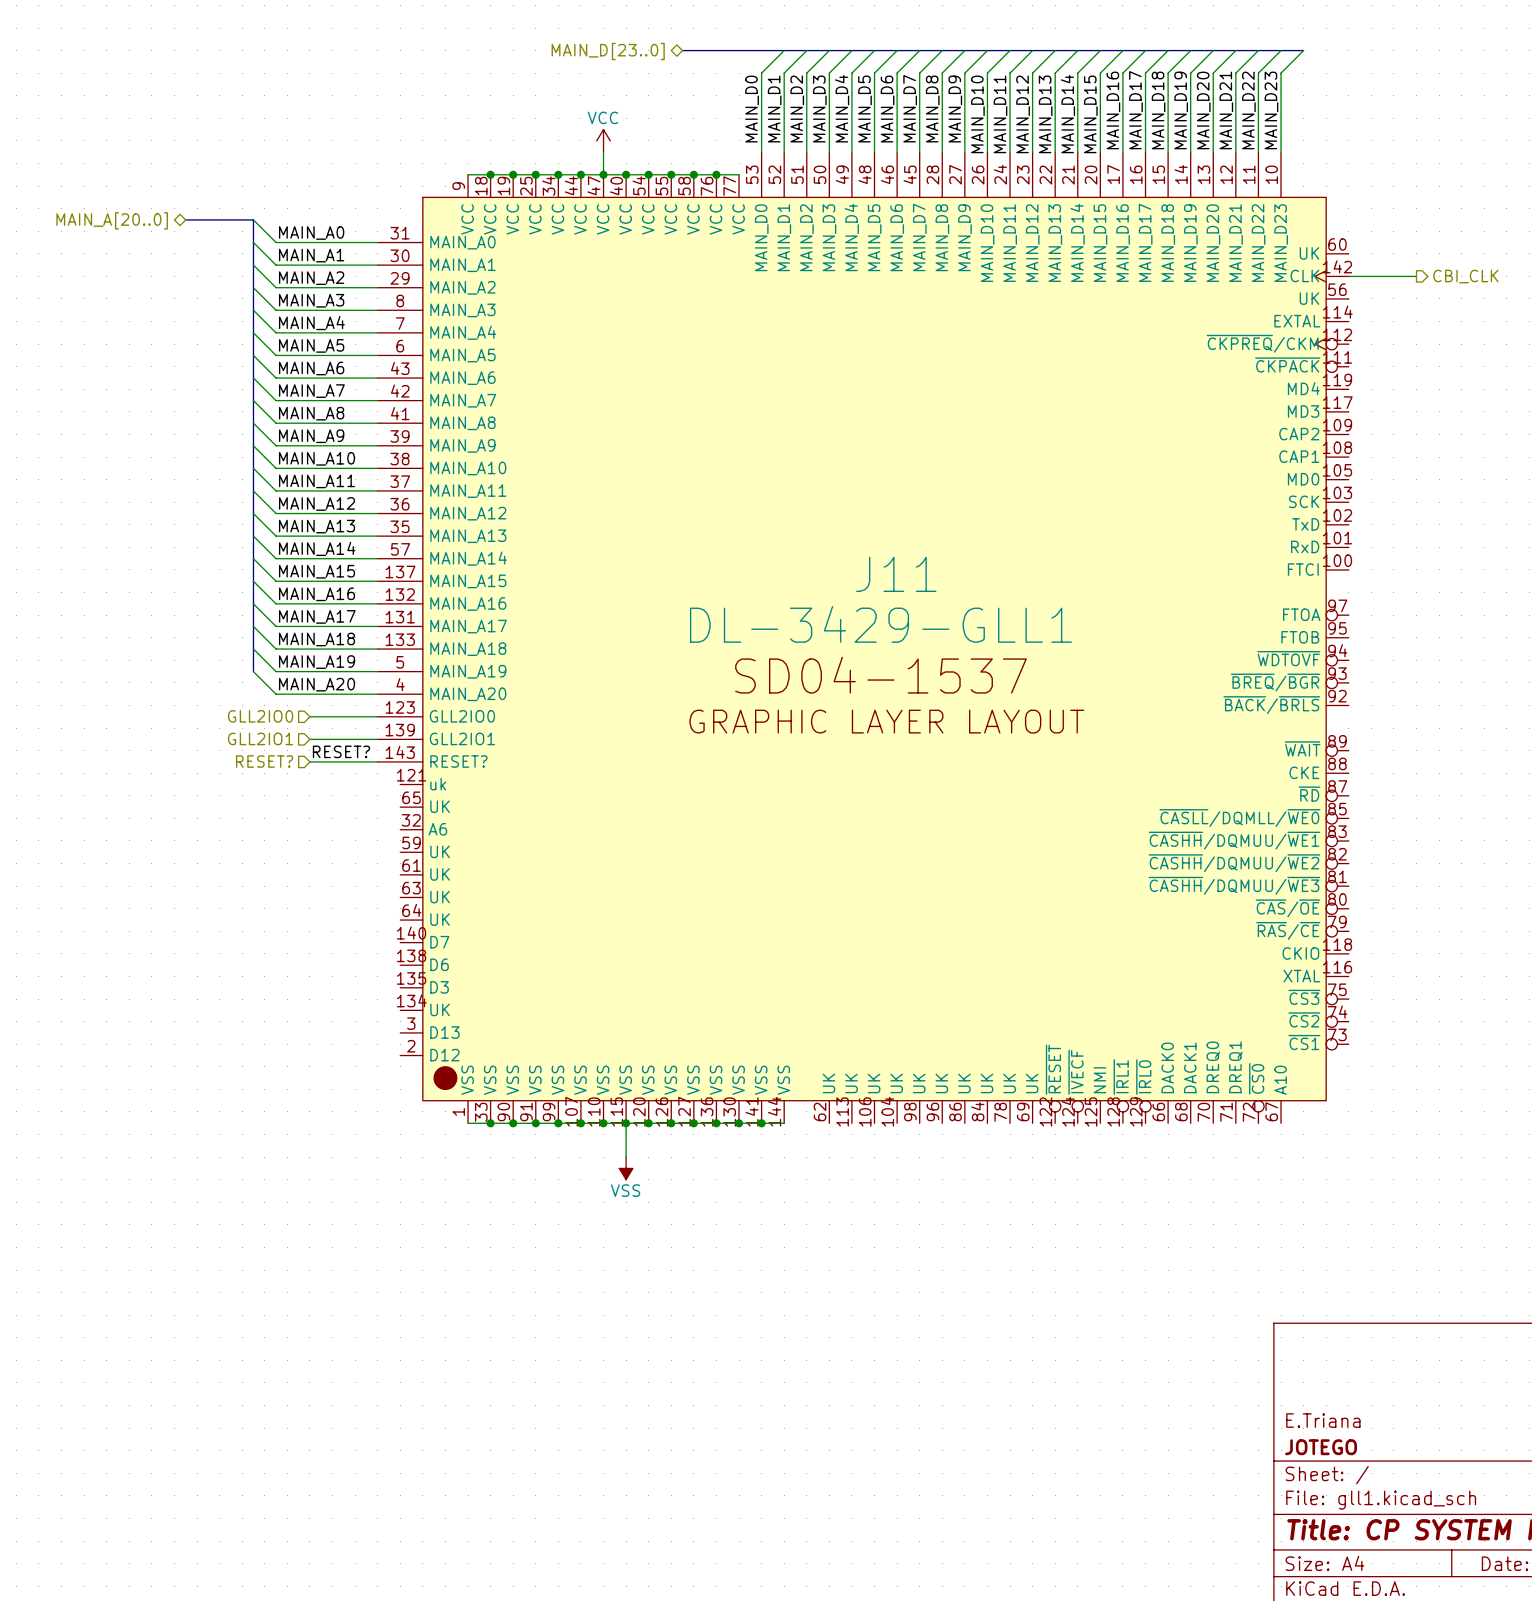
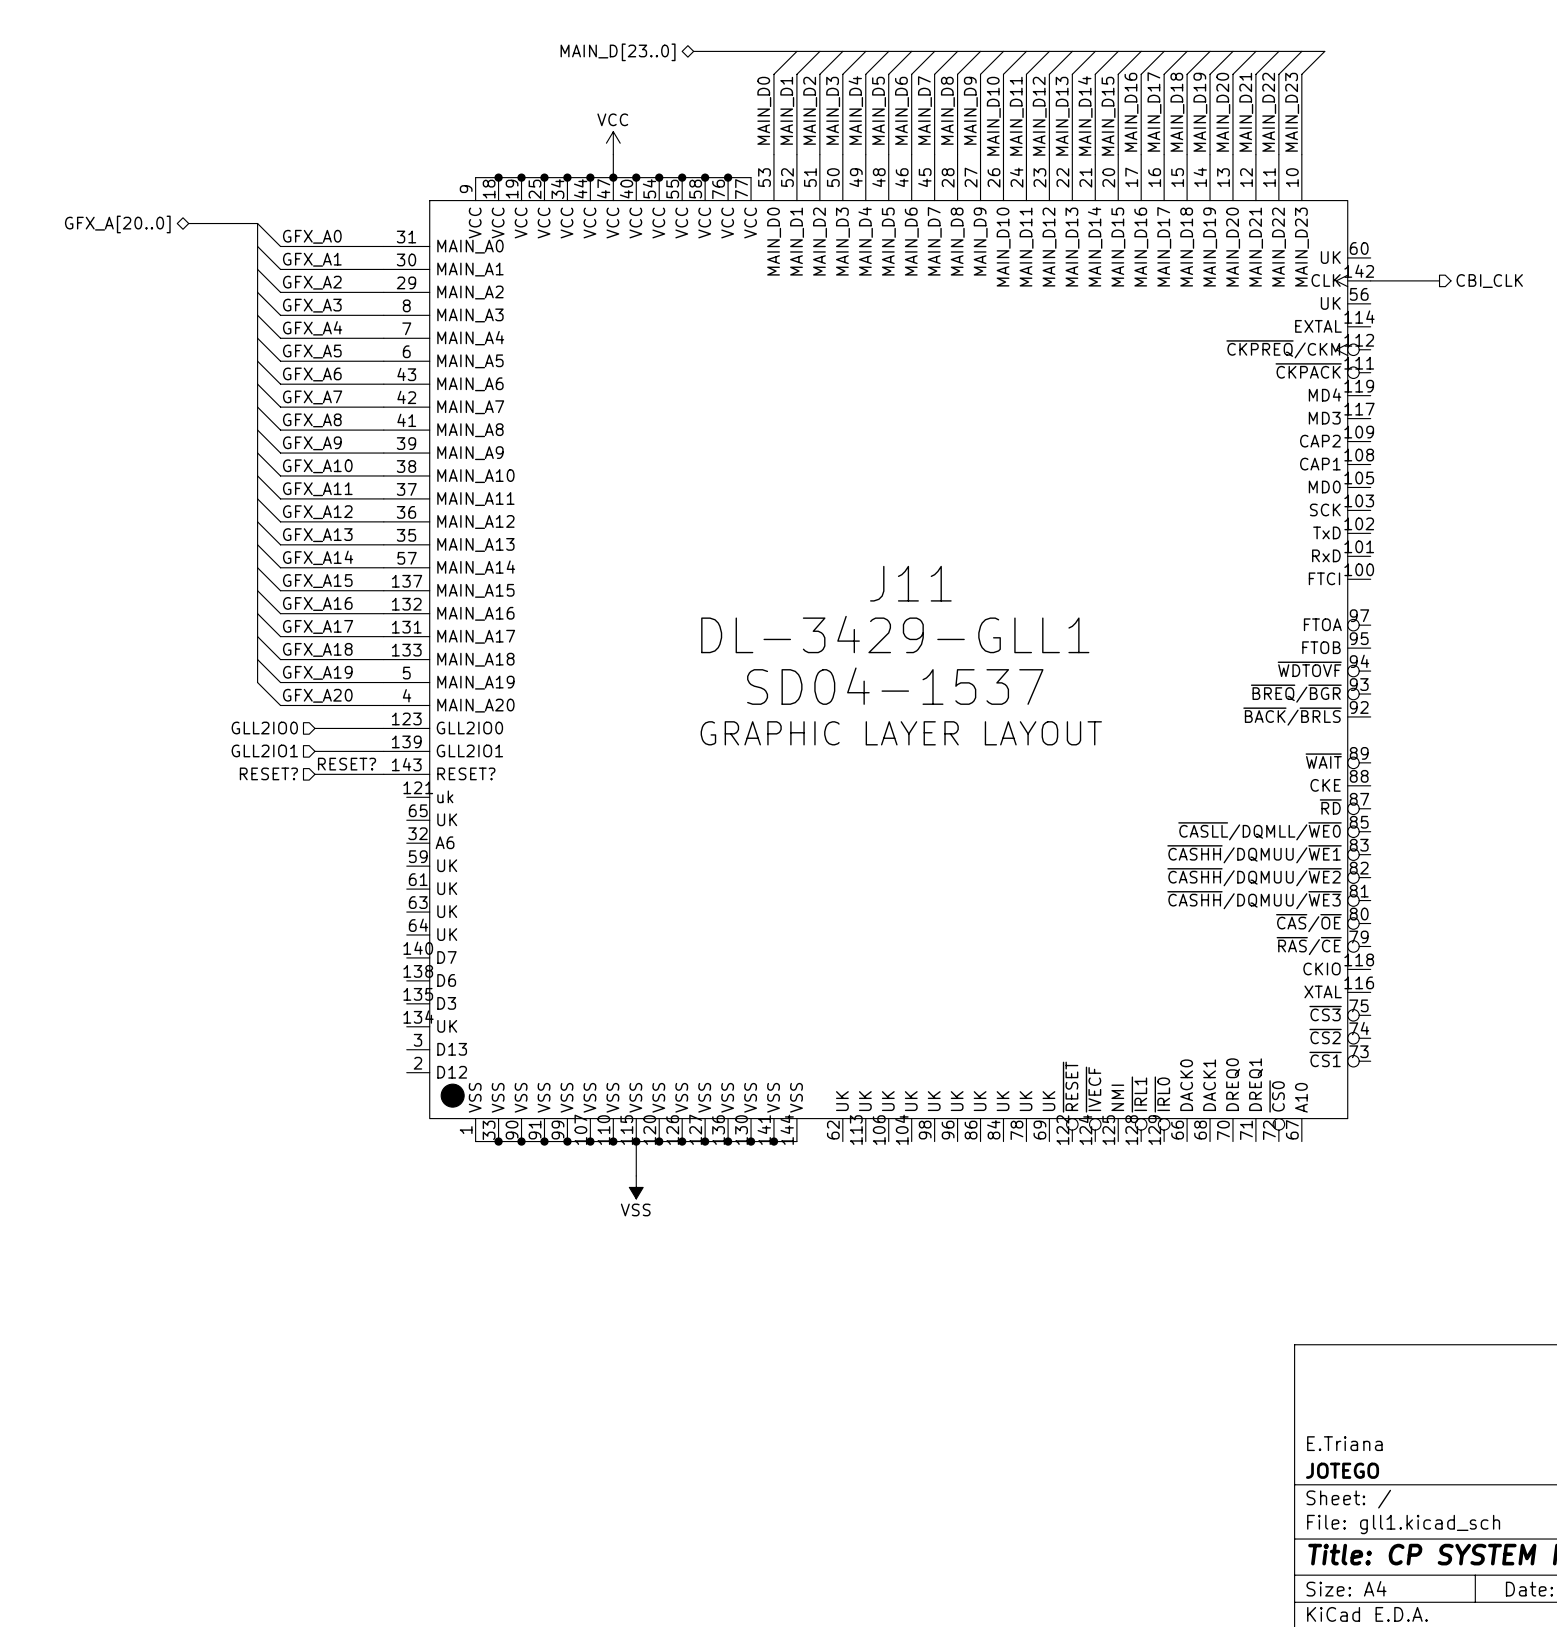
hierarchical label: MAIN_A[20..0] (112, 220) -> GFX_A[20..0] (117, 224)
label: MAIN_A0 (311, 233) -> GFX_A0 (312, 236)
label: MAIN_A1 (311, 255) -> GFX_A1 (312, 259)
label: MAIN_A2 (311, 278) -> GFX_A2 (312, 282)
label: MAIN_A3 (311, 300) -> GFX_A3 (312, 305)
label: MAIN_A4 (311, 323) -> GFX_A4 (312, 328)
label: MAIN_A5 (311, 345) -> GFX_A5 (312, 351)
label: MAIN_A6 (311, 368) -> GFX_A6 (312, 374)
label: MAIN_A7 (311, 391) -> GFX_A7 (312, 397)
label: MAIN_A8 (311, 413) -> GFX_A8 (312, 420)
label: MAIN_A9 (311, 436) -> GFX_A9 (312, 443)
label: MAIN_A10 (317, 458) -> GFX_A10 (317, 466)
label: MAIN_A11 (317, 481) -> GFX_A11 (317, 489)
label: MAIN_A12 (317, 504) -> GFX_A12 (317, 512)
label: MAIN_A13 (317, 526) -> GFX_A13 (317, 535)
label: MAIN_A14 (317, 548) -> GFX_A14 (318, 557)
label: MAIN_A15 (317, 571) -> GFX_A15 (317, 581)
label: MAIN_A16 (317, 594) -> GFX_A16 (317, 603)
label: MAIN_A17 (317, 616) -> GFX_A17 (318, 626)
label: MAIN_A18 (317, 639) -> GFX_A18 (317, 649)
label: MAIN_A19 (317, 662) -> GFX_A19 (317, 672)
label: MAIN_A20 (317, 684) -> GFX_A20 (317, 695)

